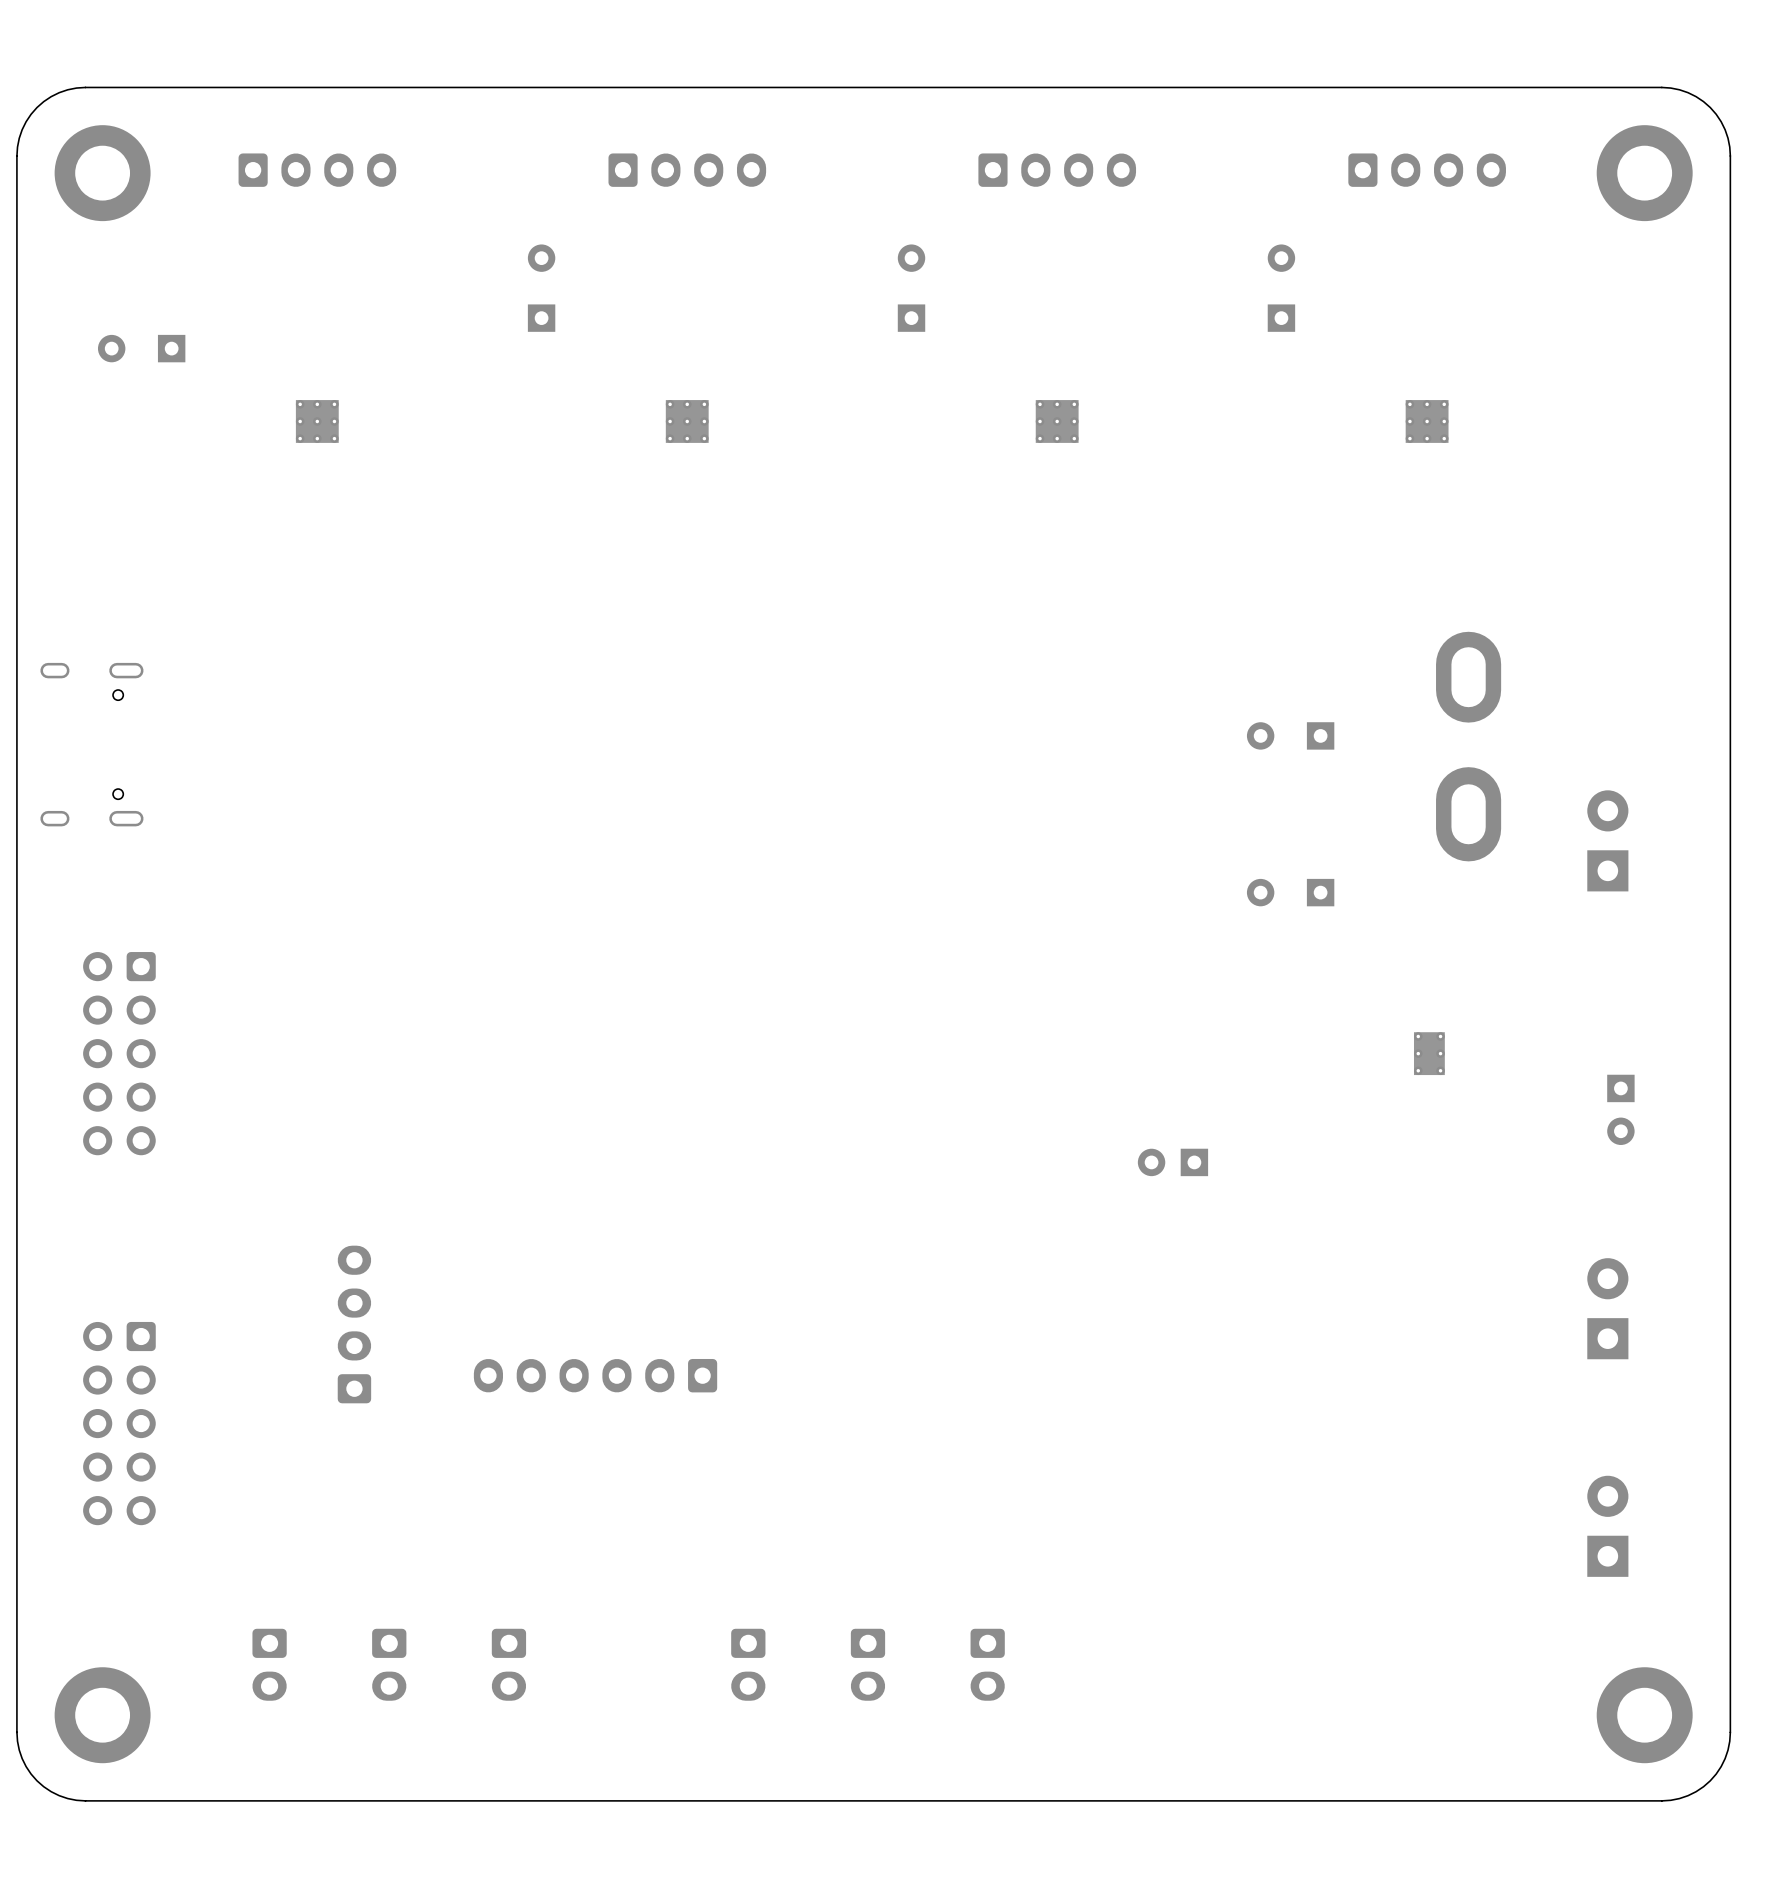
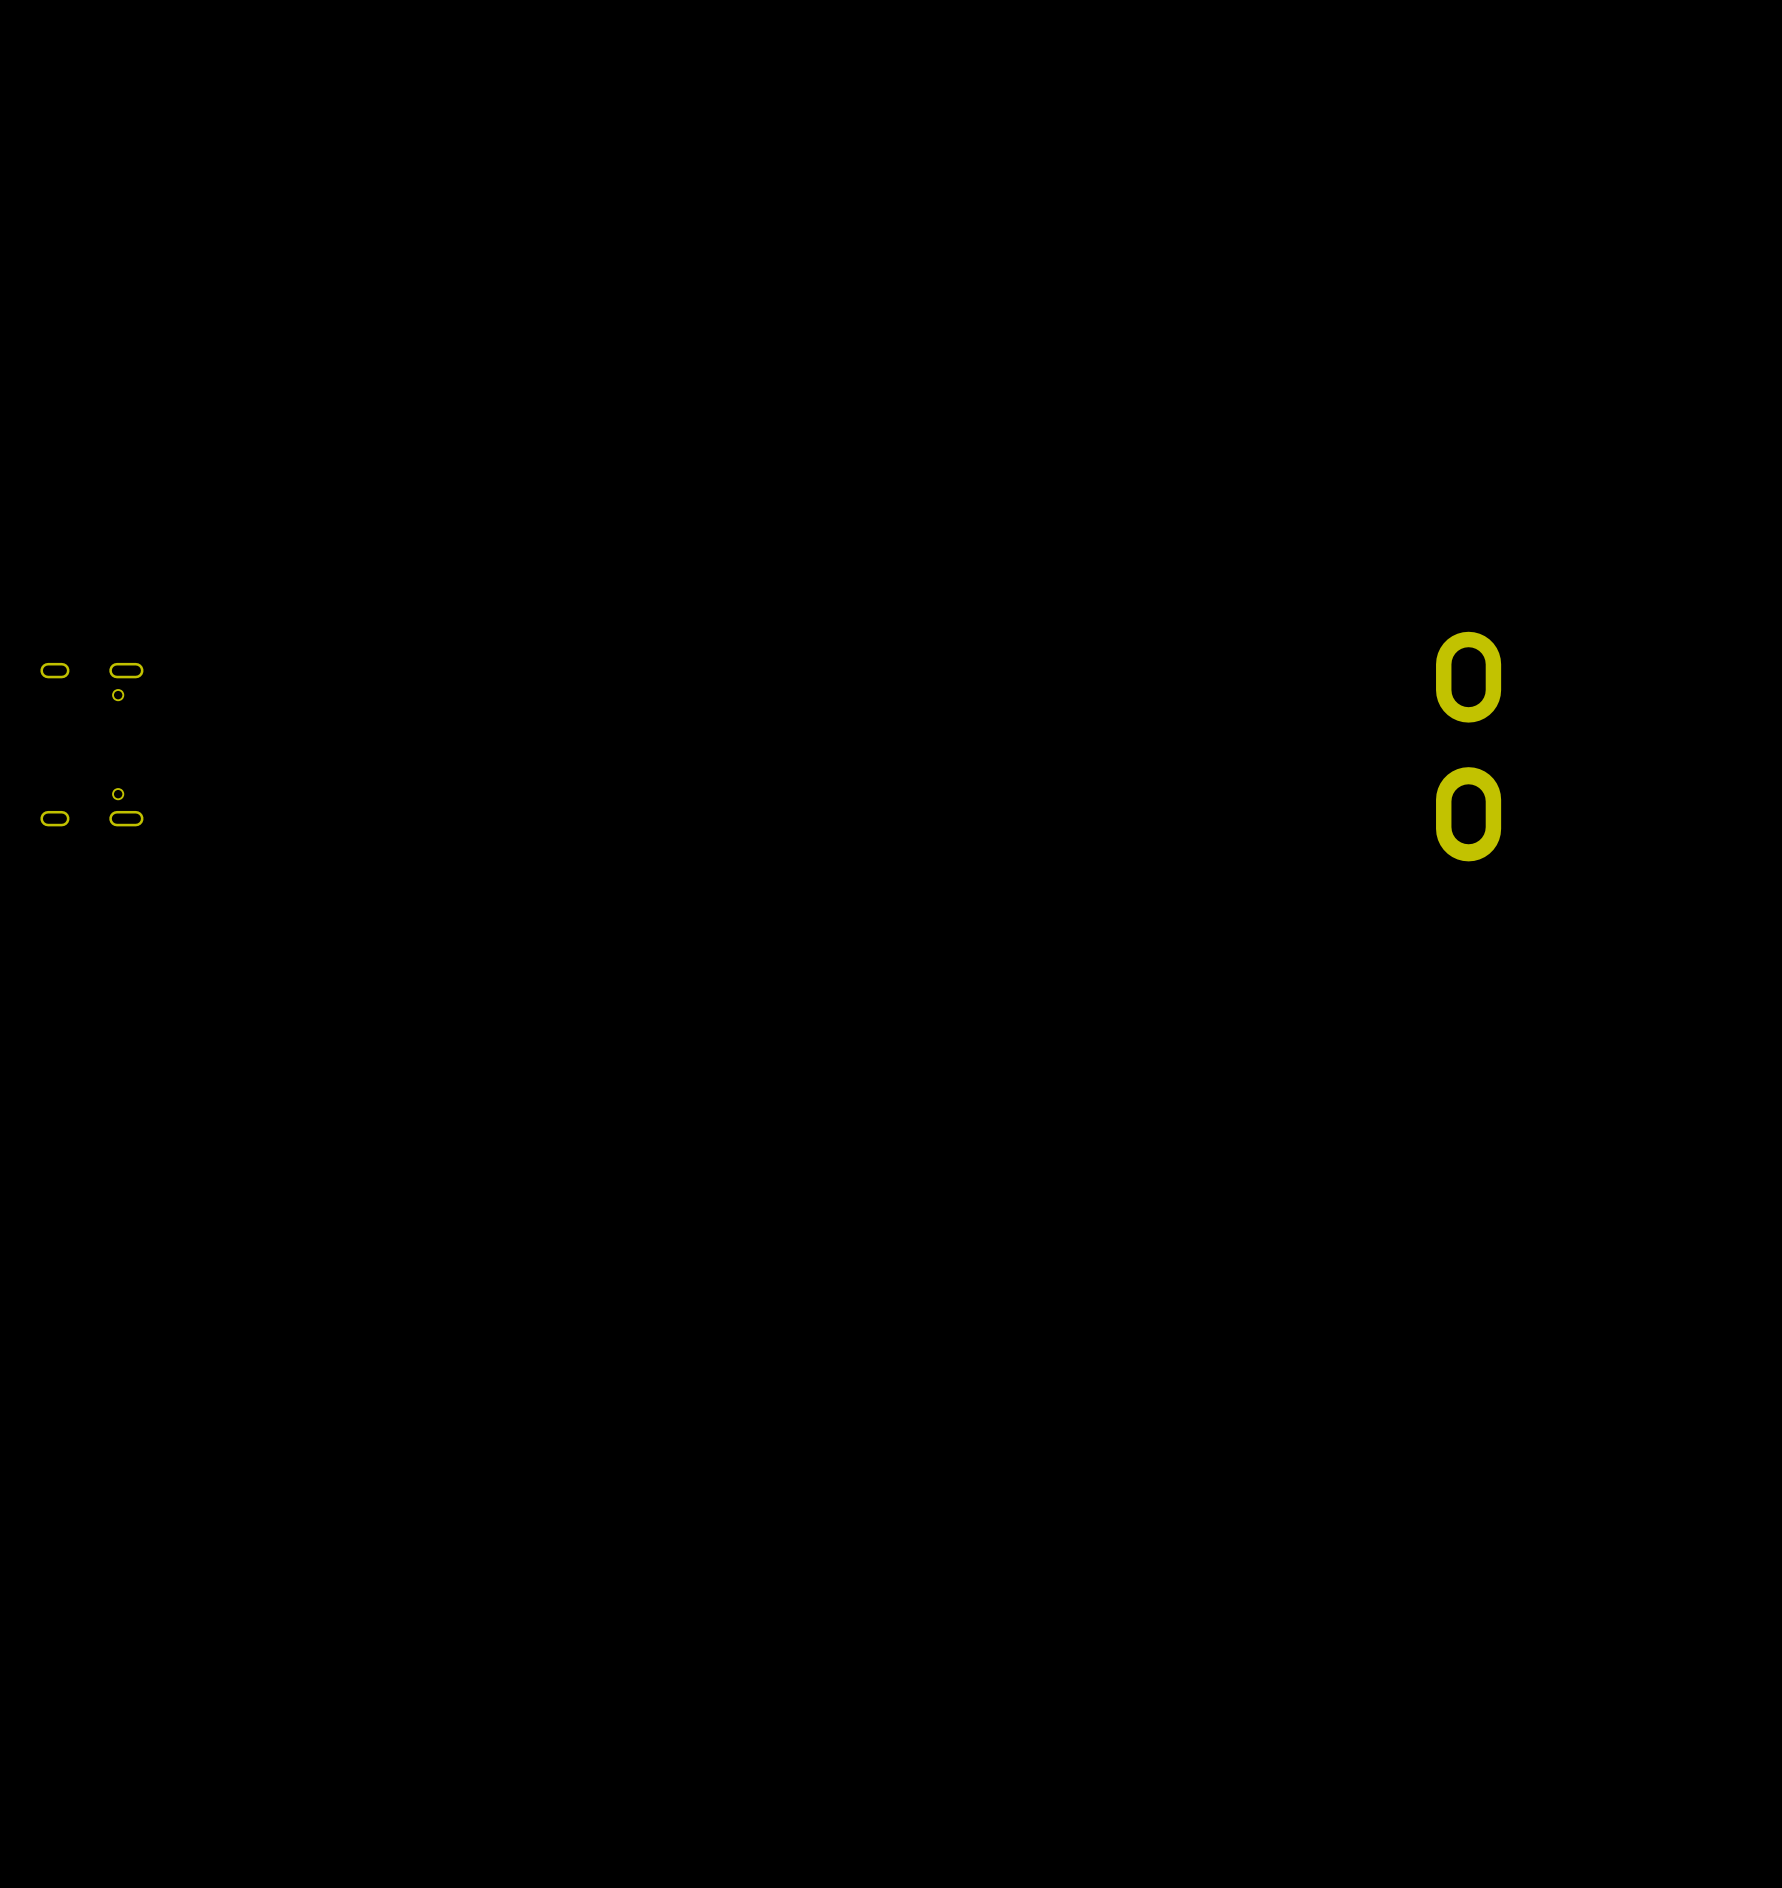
board edge: (1661, 87) (85, 87) (59, 92) (37, 107) (22, 129) (16, 156) (16, 1732) (22, 1758) (37, 1780) (59, 1795) (85, 1800) (1661, 1800) (1688, 1795) (1710, 1780) (1725, 1758) (1730, 1732) (1730, 156) (1725, 129) (1710, 107) (1688, 92) (1661, 87) -> none
part: (317, 170) -> none
part: (687, 170) -> none
part: (1057, 170) -> none
part: (1427, 170) -> none
part: (102, 173) -> none
part: (1644, 173) -> none
part: (541, 288) -> none
part: (911, 288) -> none
part: (1281, 288) -> none
part: (141, 348) -> none
part: (317, 421) -> none
part: (687, 421) -> none
part: (1057, 421) -> none
part: (1427, 421) -> none
part: (1290, 735) -> none
part: (1607, 840) -> none
part: (1290, 892) -> none
part: (119, 1053) -> none
part: (1429, 1053) -> none
part: (1620, 1109) -> none
part: (1172, 1162) -> none
part: (1607, 1308) -> none
part: (354, 1324) -> none
part: (595, 1375) -> none
part: (119, 1423) -> none
part: (1607, 1526) -> none
part: (269, 1664) -> none
part: (389, 1664) -> none
part: (508, 1664) -> none
part: (748, 1664) -> none
part: (867, 1664) -> none
part: (987, 1664) -> none
part: (102, 1715) -> none
part: (1644, 1715) -> none

